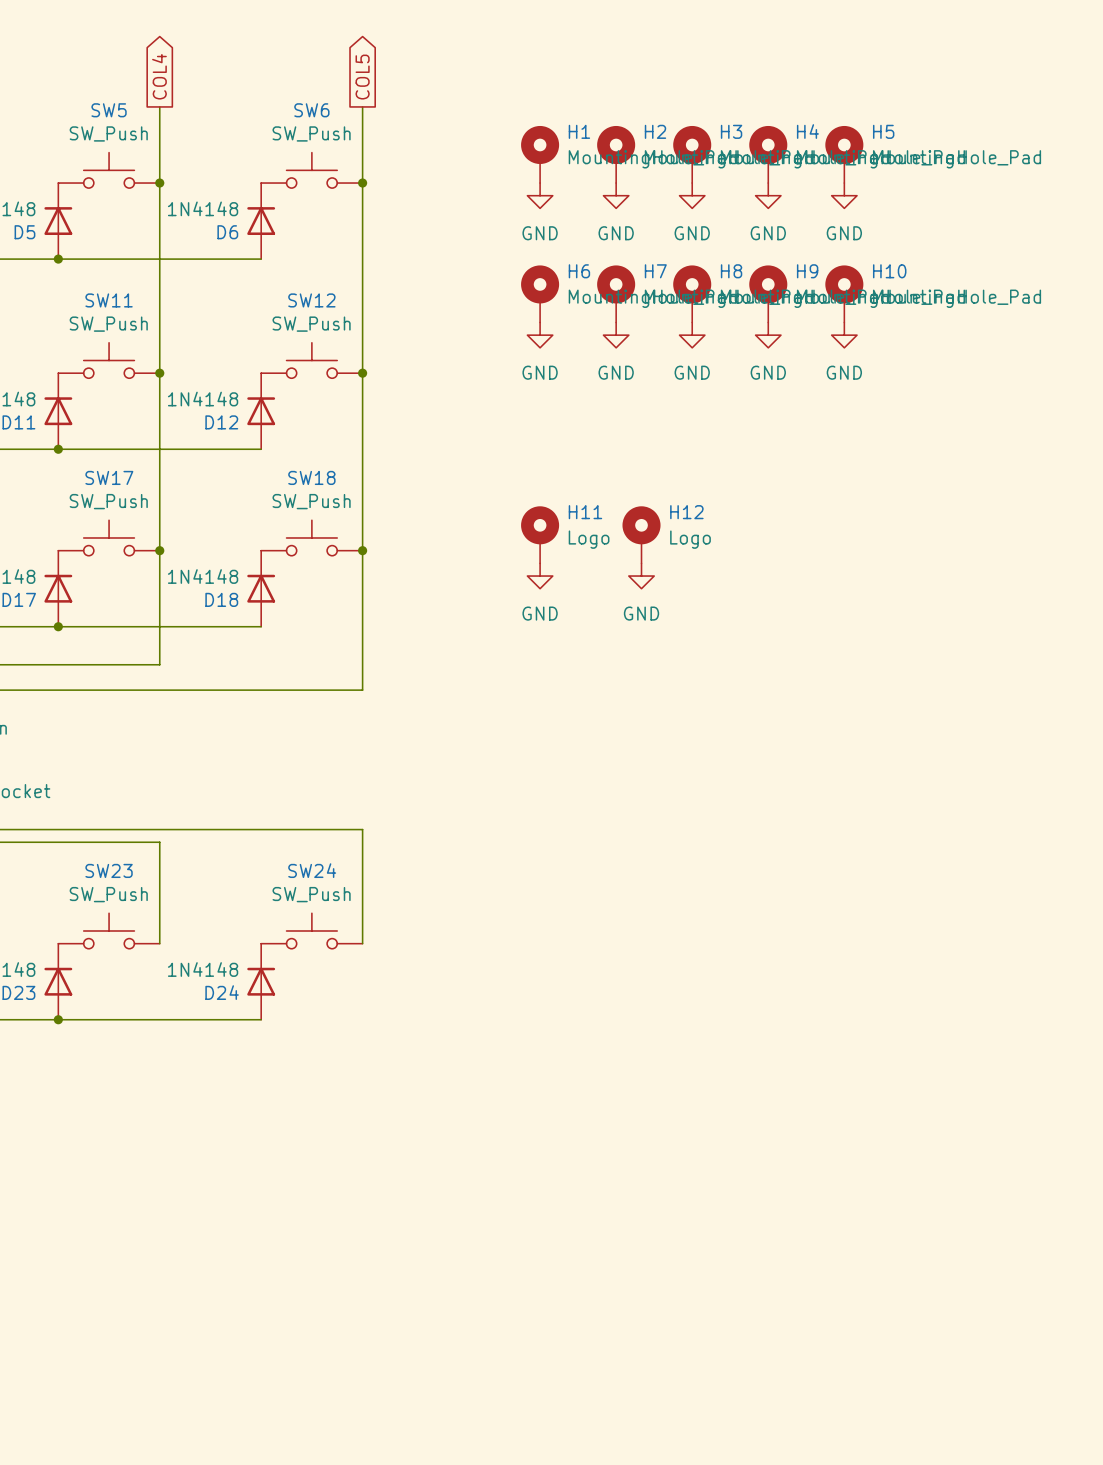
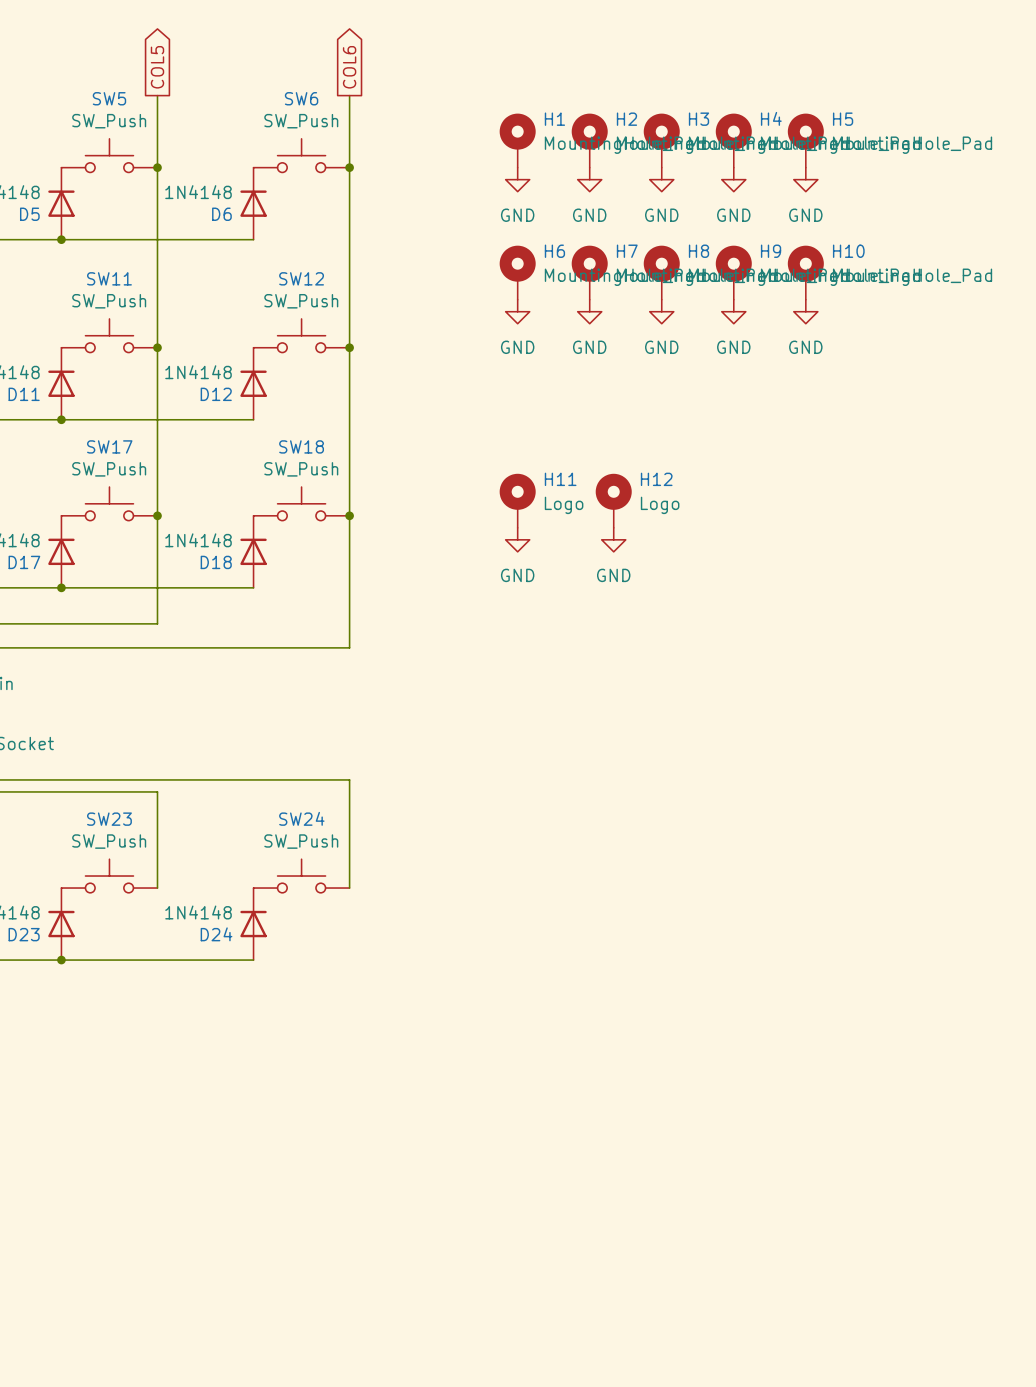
global label: COL4 (159, 76) -> COL5 (157, 67)
global label: COL5 (362, 77) -> COL6 (349, 67)

